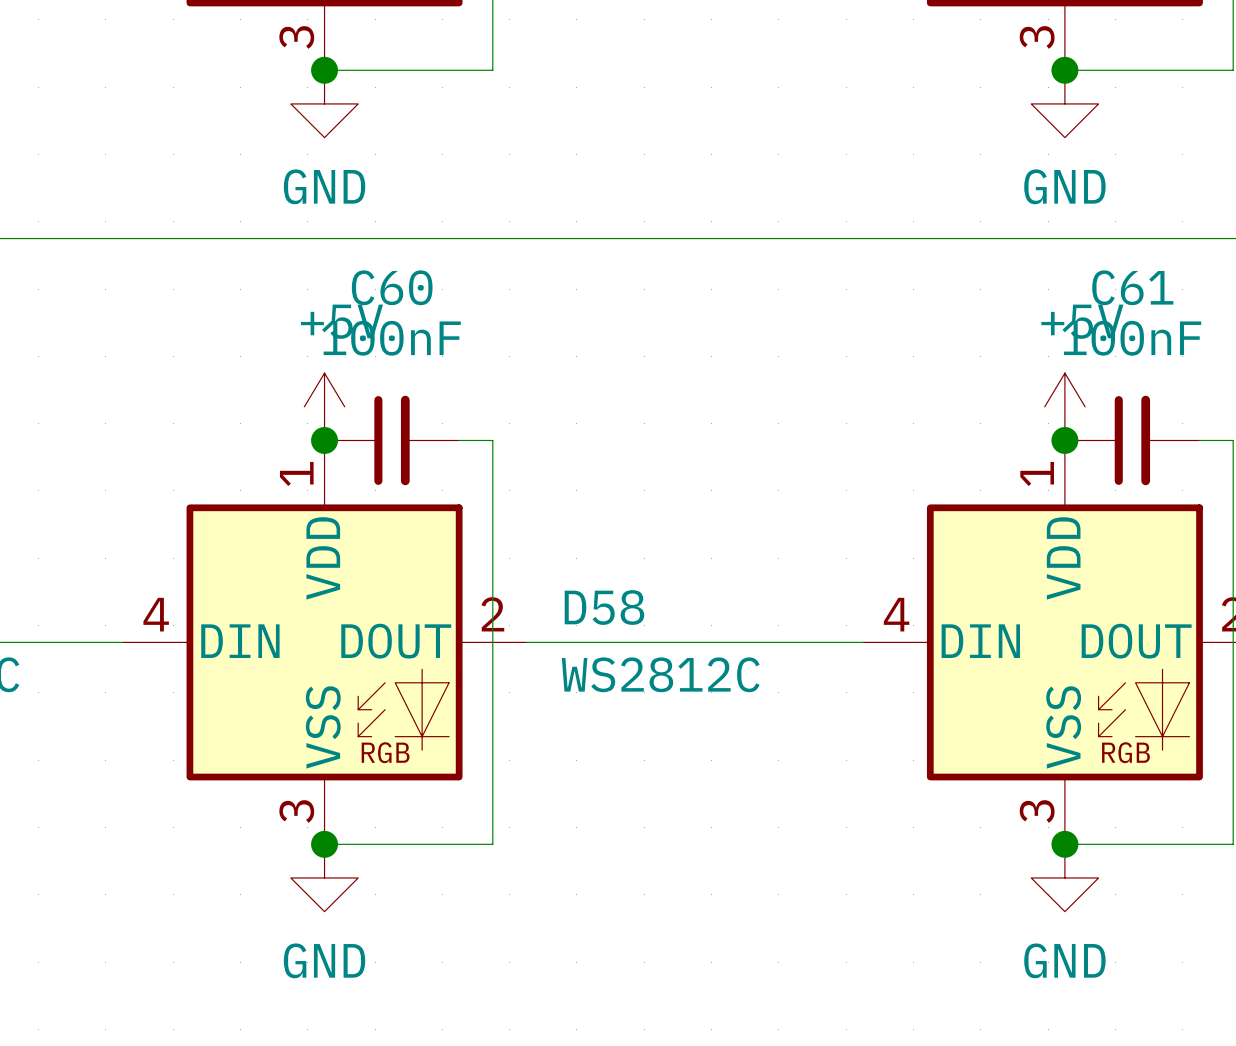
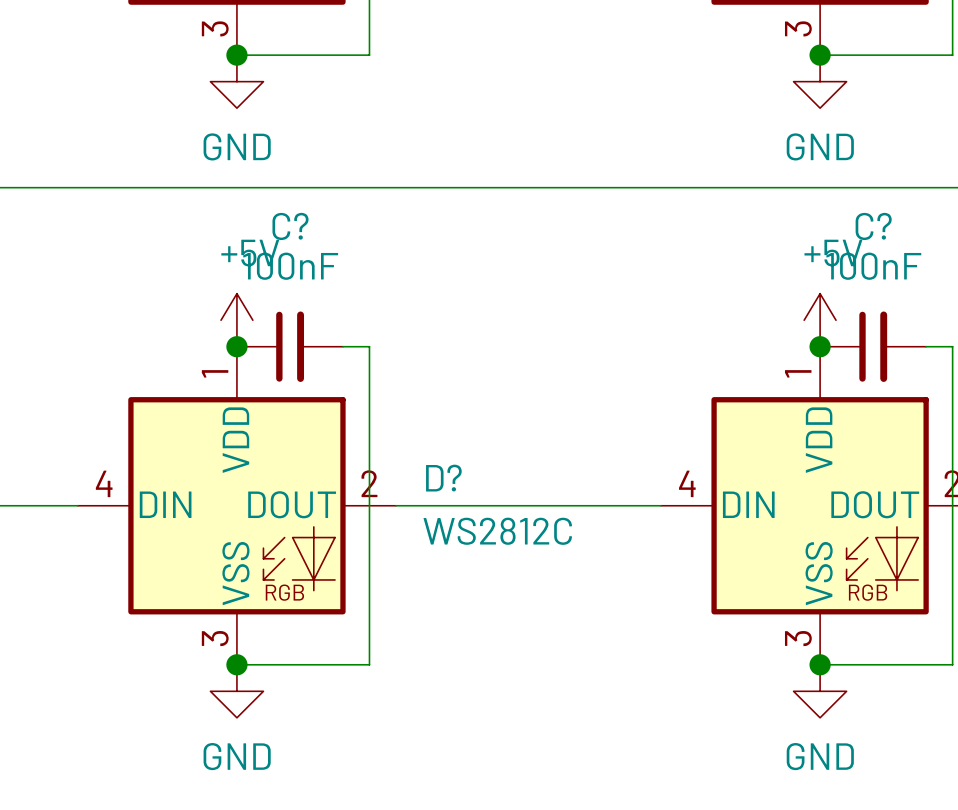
C60 name: C60 (392, 287) -> C? (290, 226)
C61 name: C61 (1132, 287) -> C? (873, 226)
D58 name: D58 (604, 607) -> D? (443, 478)

